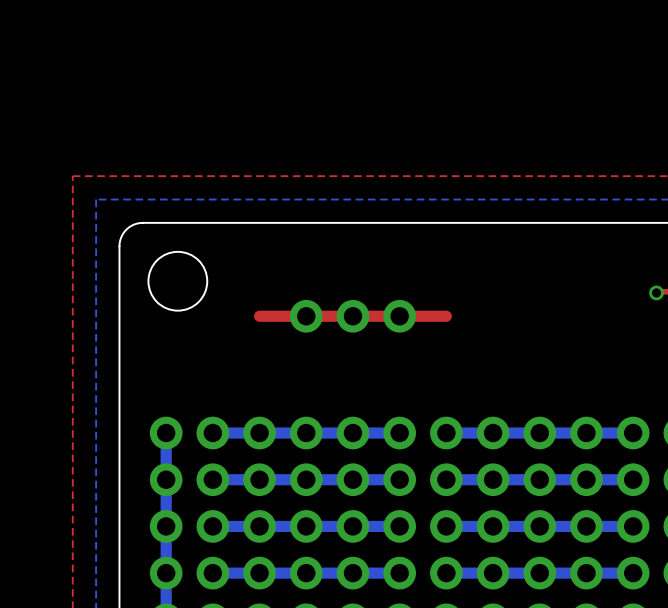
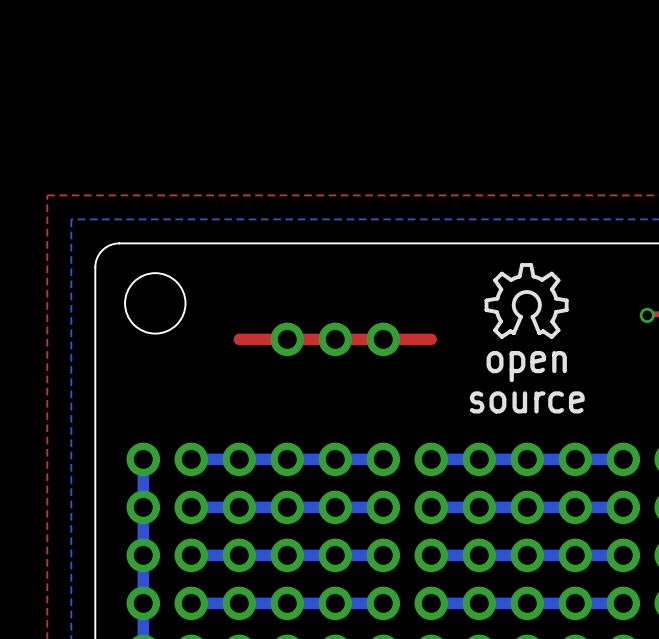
drawing: none -> [484, 263, 569, 339]
text: none -> open (526, 366)
text: none -> source (527, 402)

